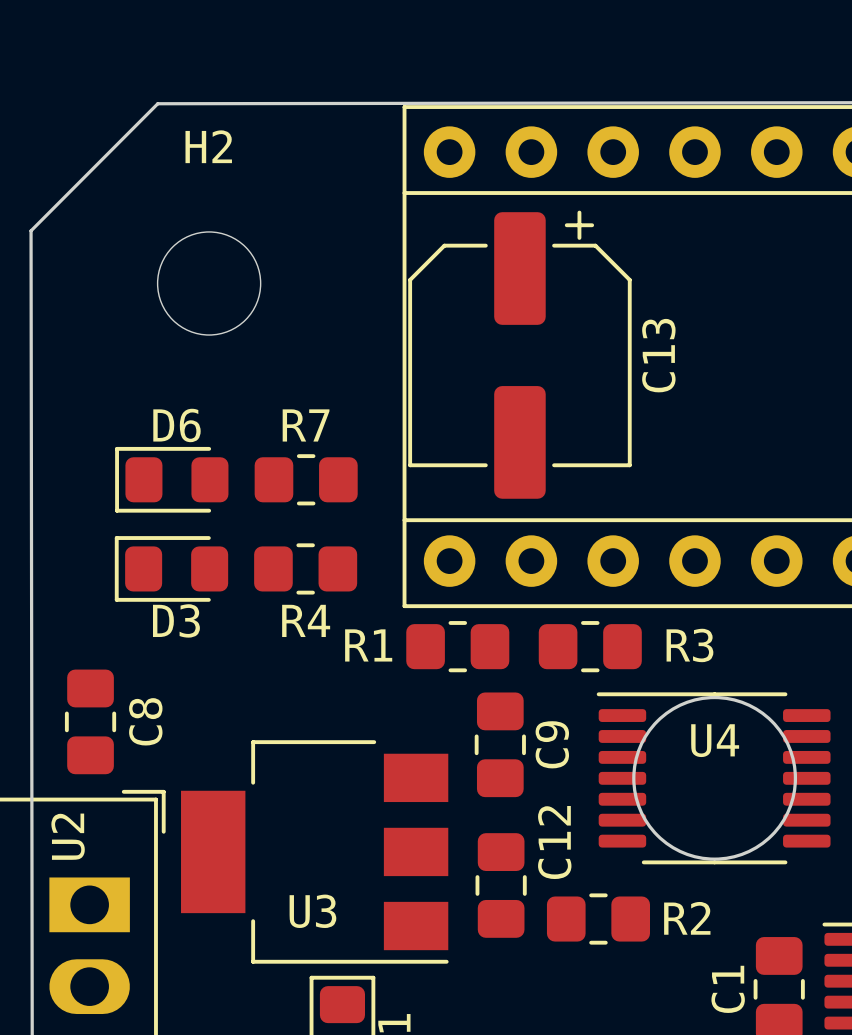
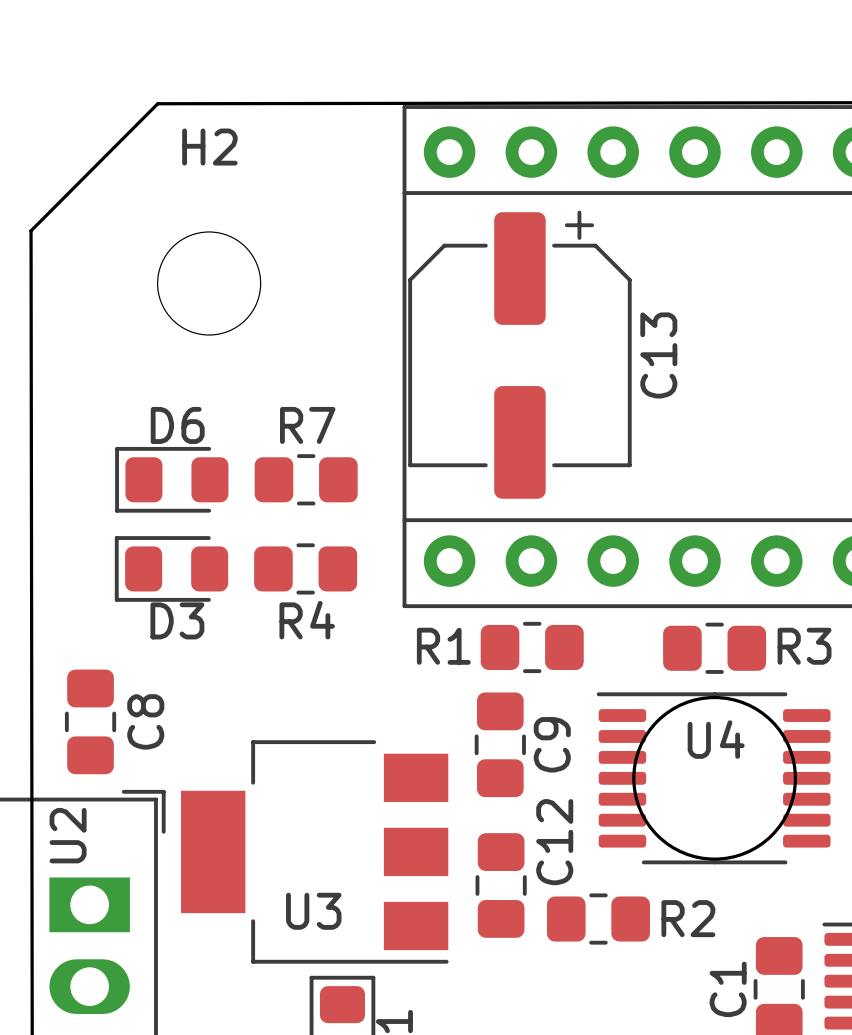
R3 name position: R3 (689, 645) -> R3 (804, 646)
R1 position: (457, 646) -> (532, 647)
R3 position: (590, 646) -> (714, 648)

